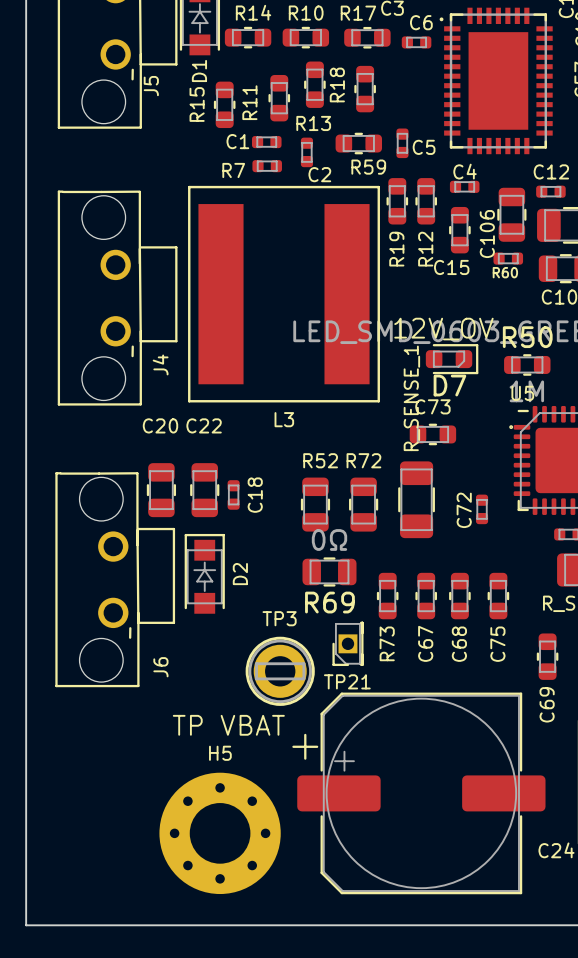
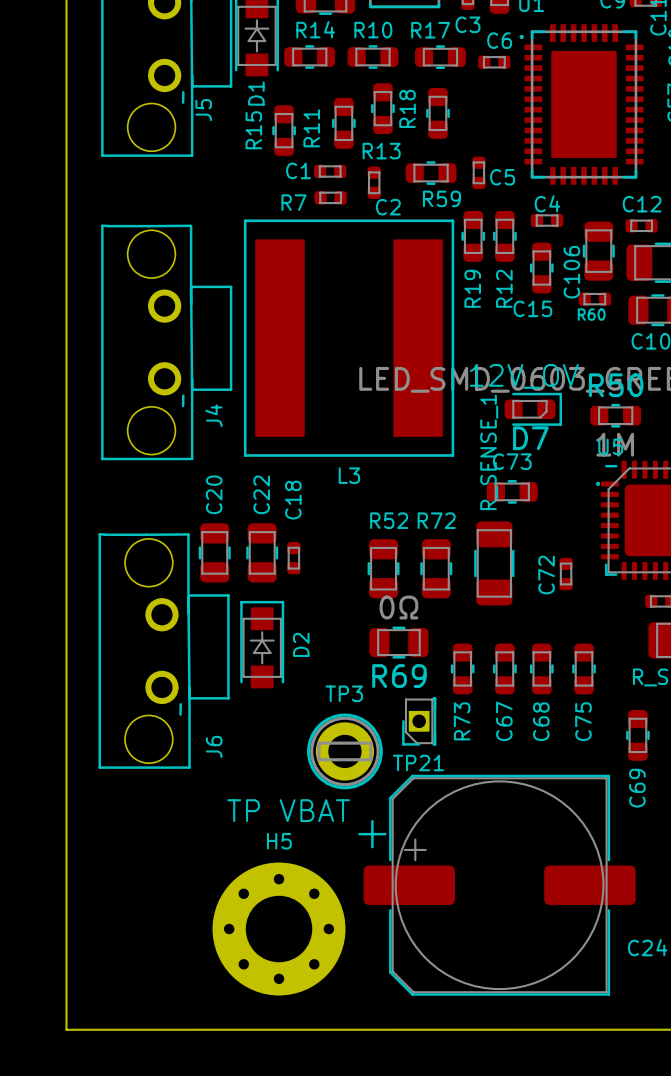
C20 name rotation: 0° (160, 425) -> 90° counterclockwise (214, 494)
C22 name rotation: 0° (204, 425) -> 90° counterclockwise (261, 494)
C18 name position: C18 (255, 495) -> C18 (293, 500)

